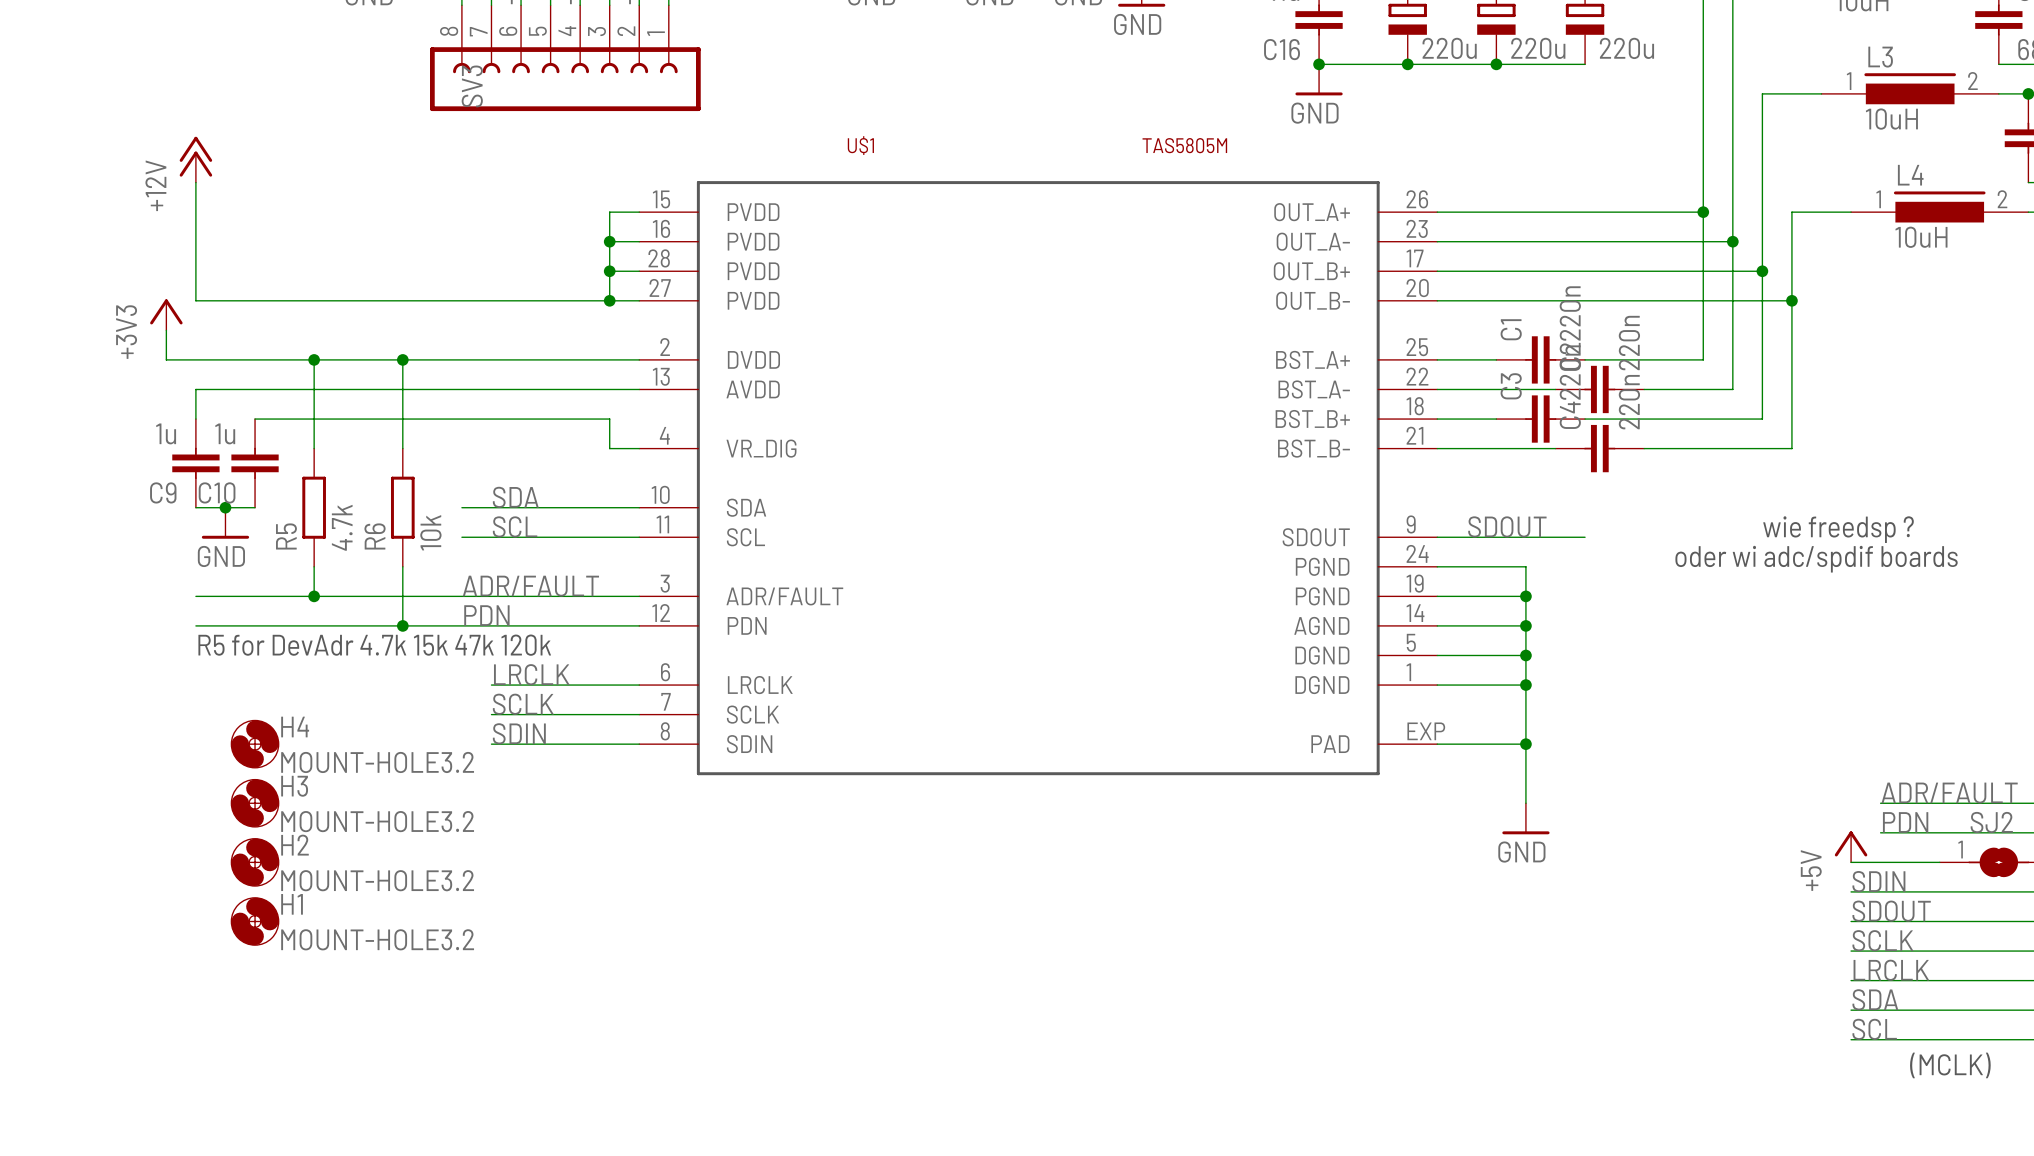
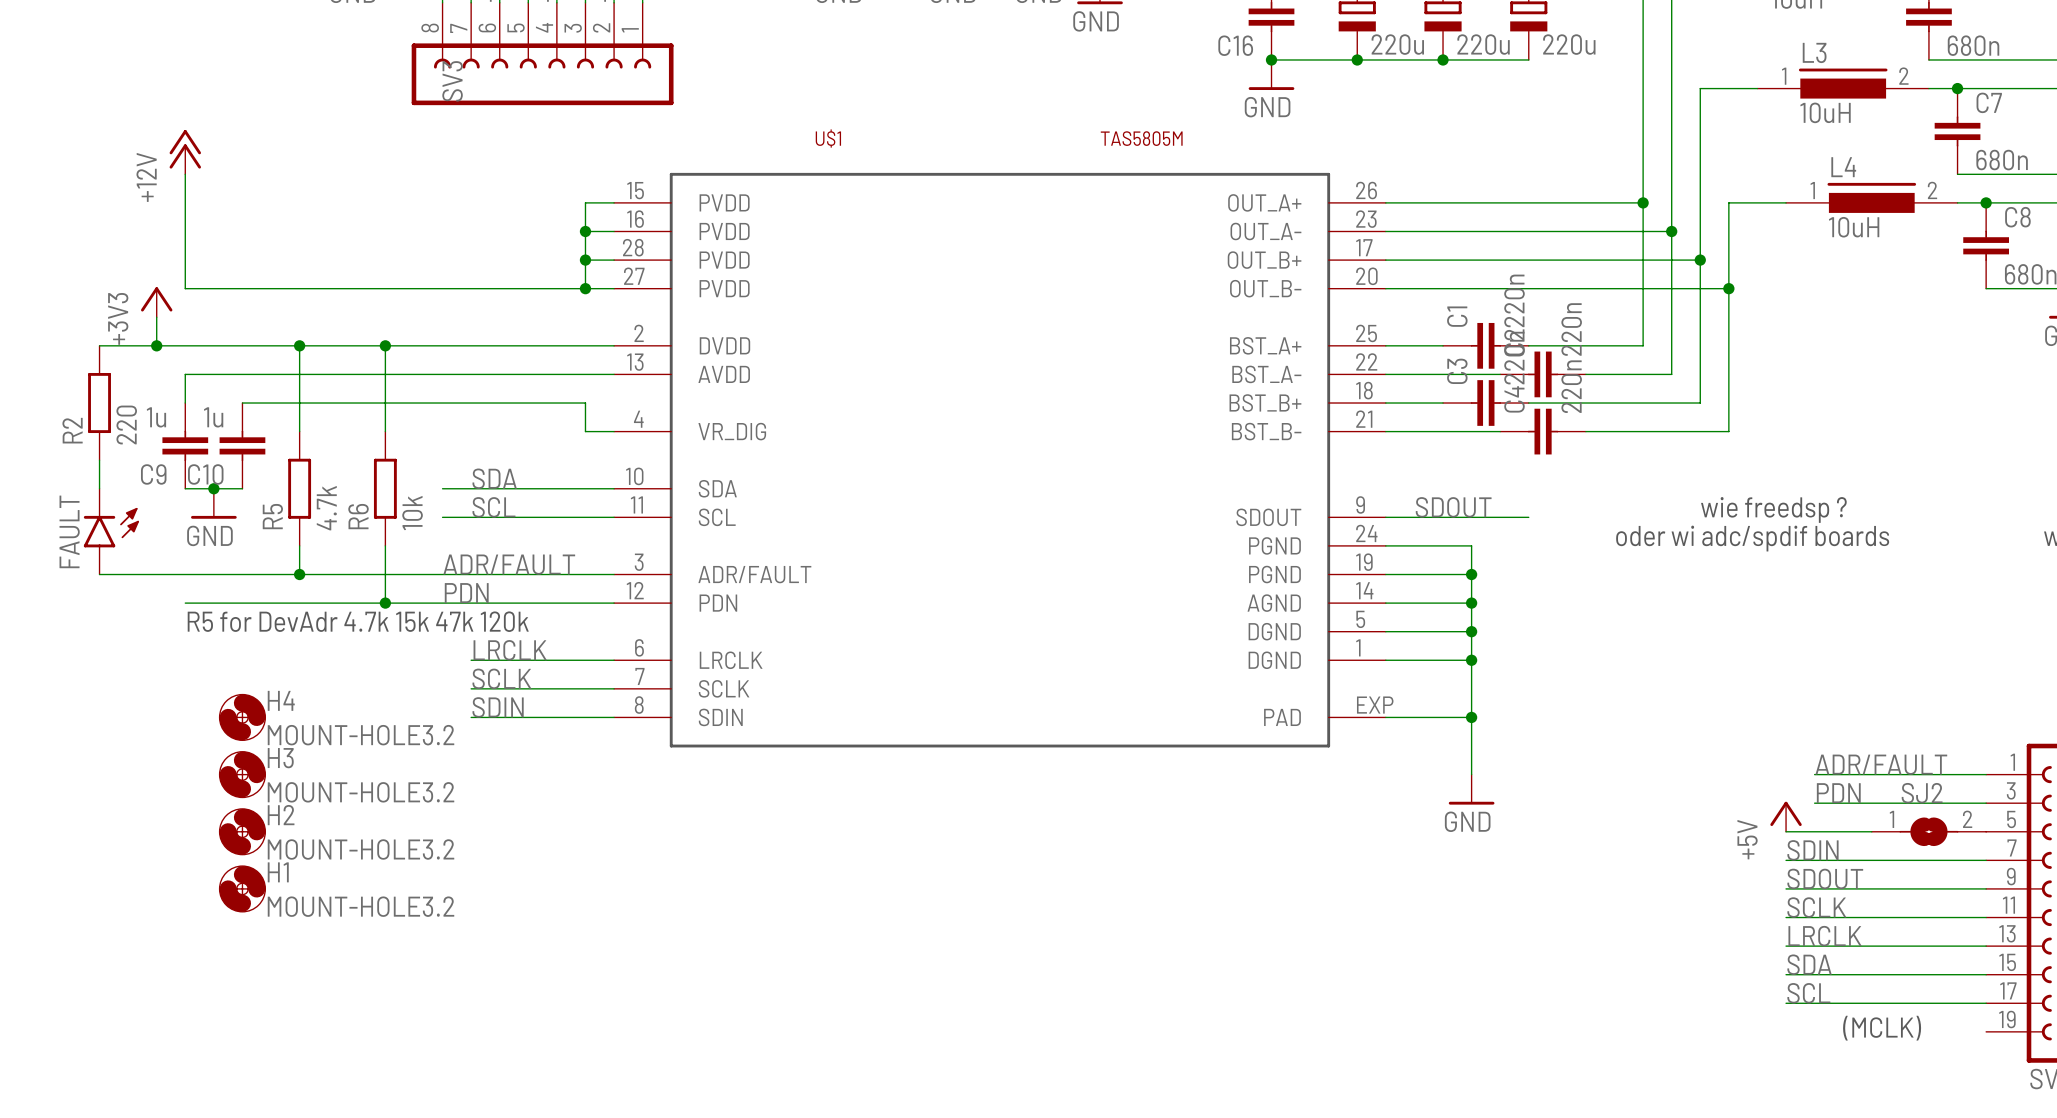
wire: none -> (99, 345) (156, 345)
junction: none -> (156, 345)
R2: none -> 220 (99, 403)
wire: none -> (99, 460) (99, 488)
FAULT: none -> (111, 531)
wire: none -> (99, 574) (185, 574)

